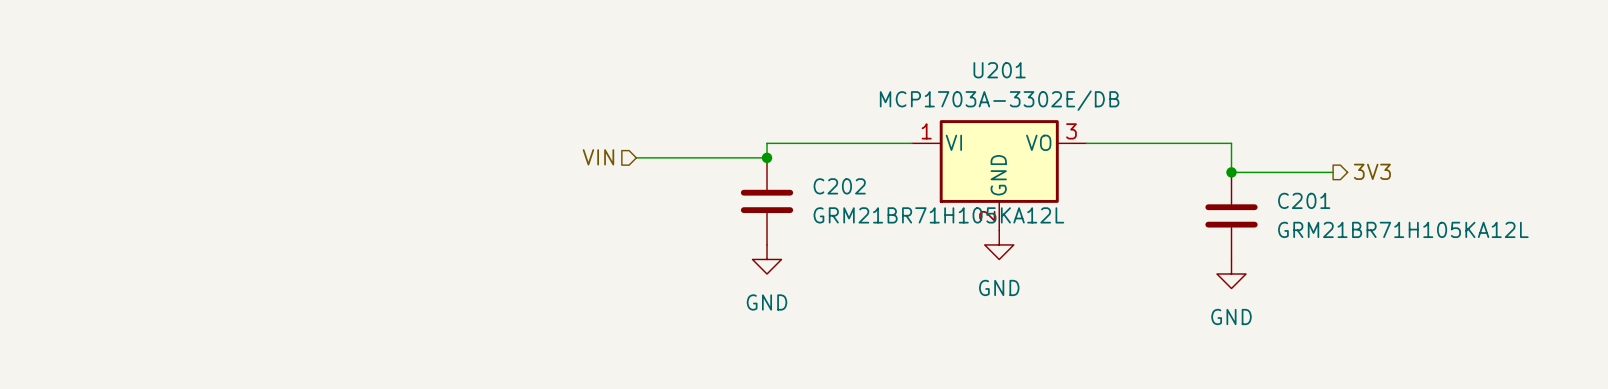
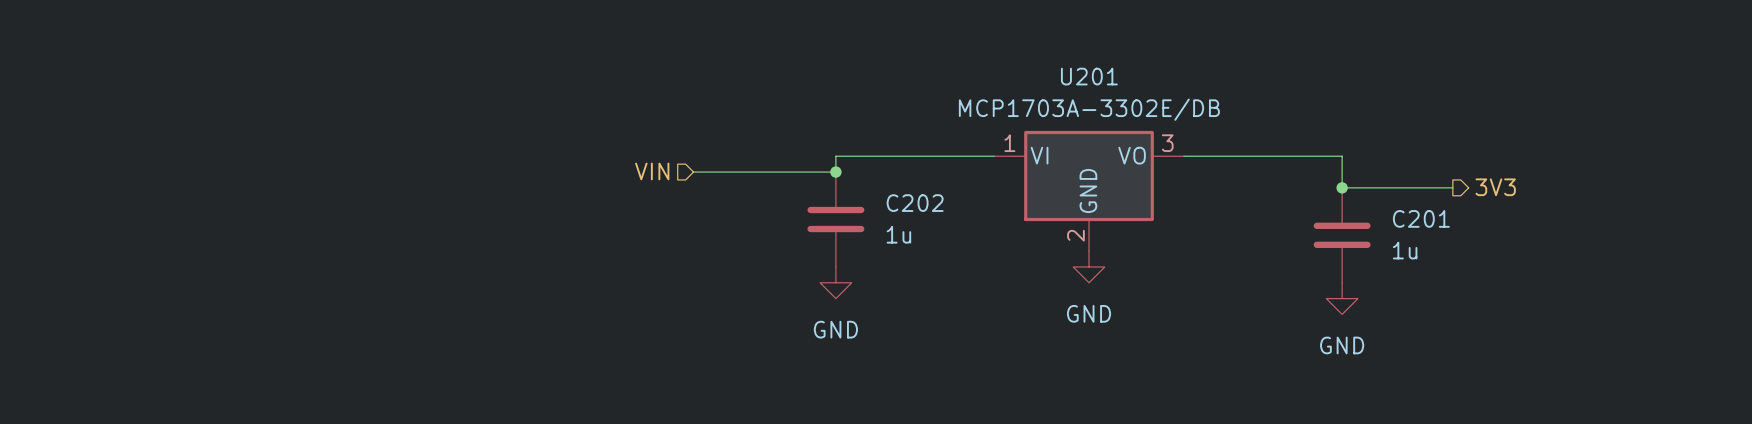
C202 value: GRM21BR71H105KA12L (938, 215) -> 1u (898, 234)
C201 value: GRM21BR71H105KA12L (1403, 229) -> 1u (1405, 250)

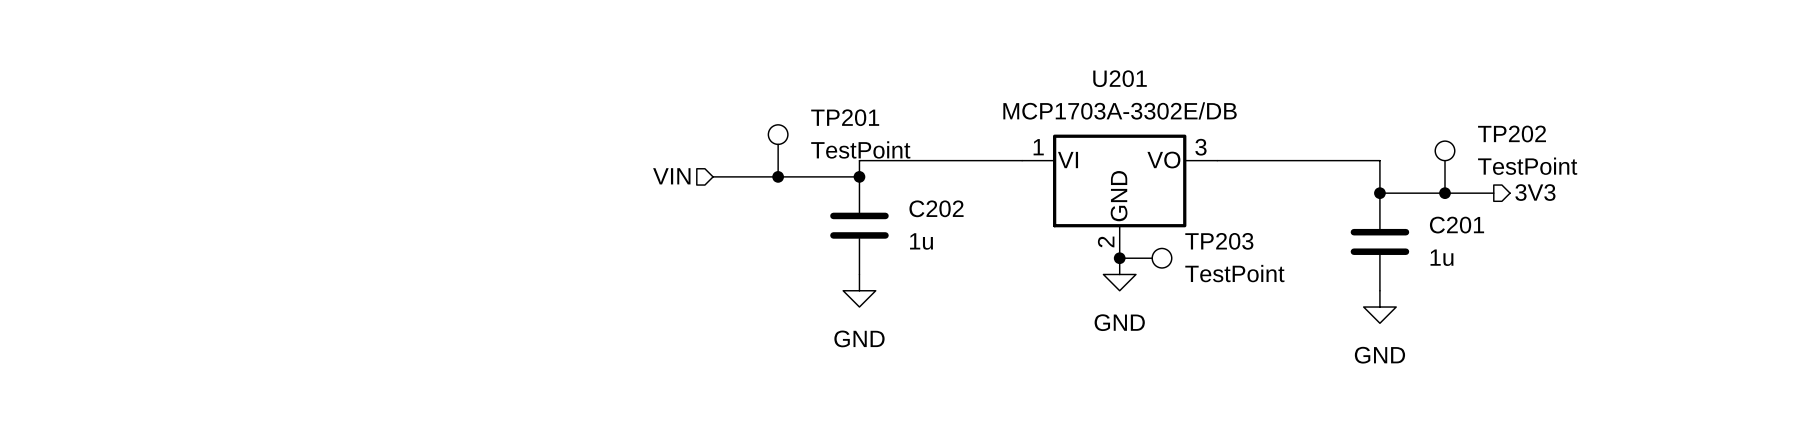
TP201: none -> TestPoint (778, 150)
TP202: none -> TestPoint (1444, 167)
junction: none -> (778, 176)
junction: none -> (1444, 193)
junction: none -> (1119, 258)
TP203: none -> TestPoint (1145, 258)

